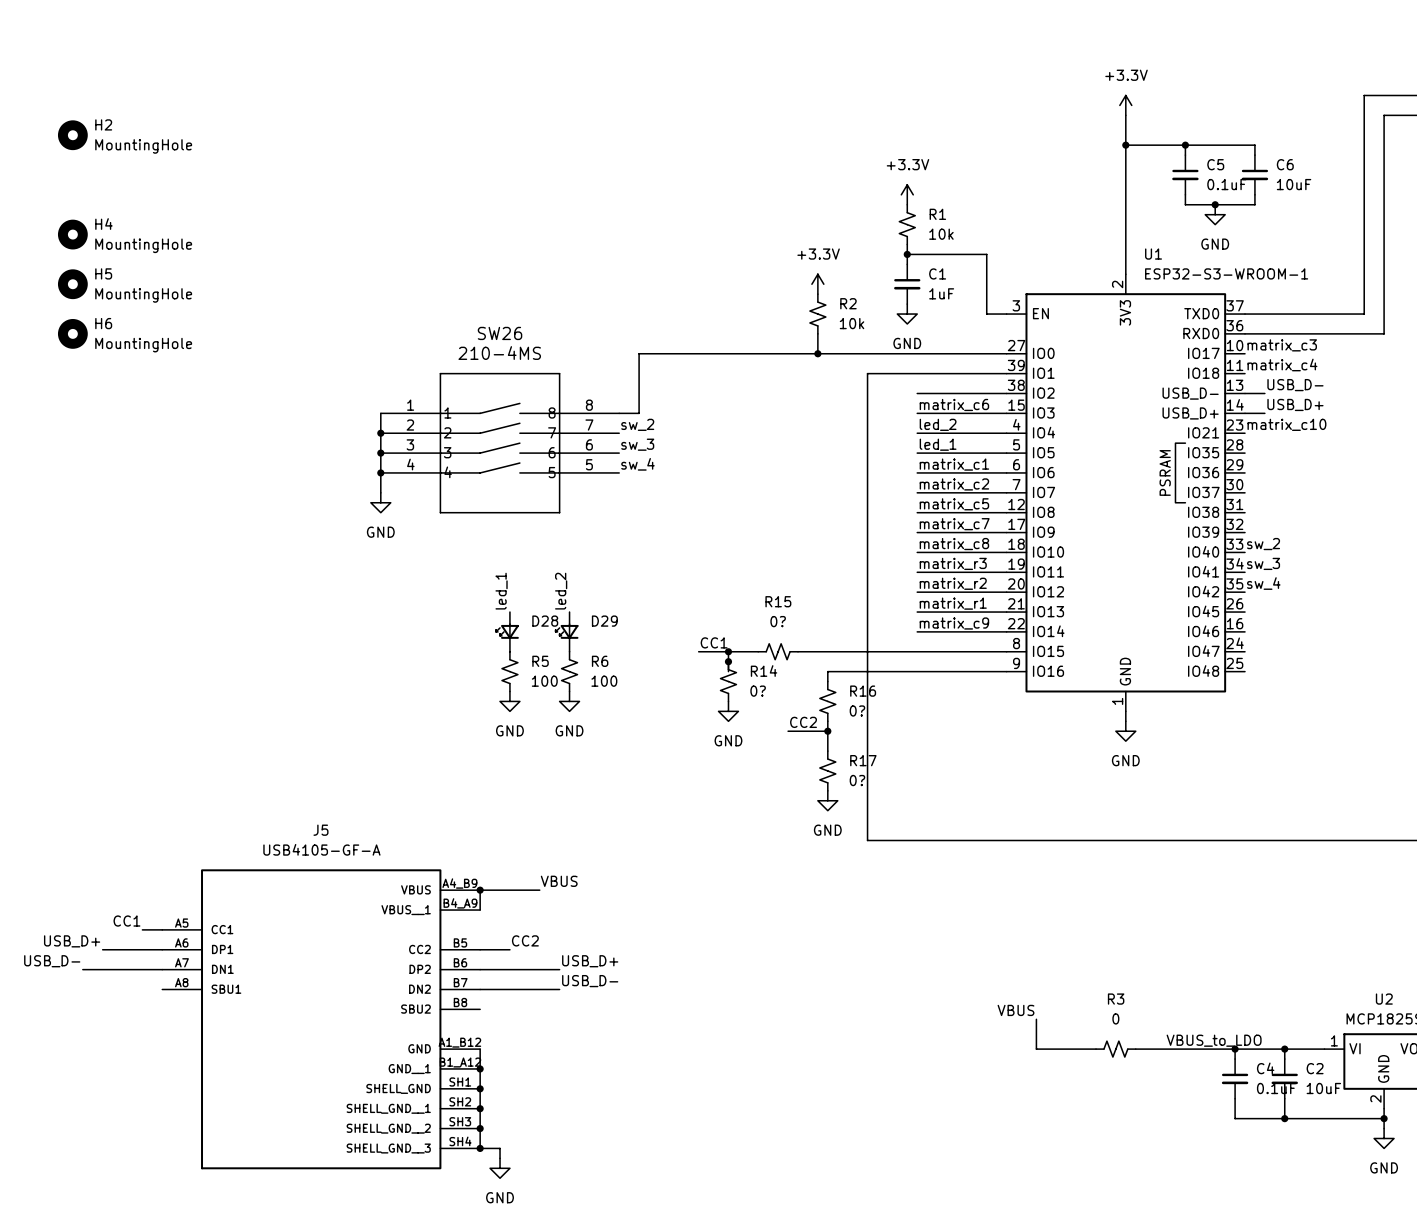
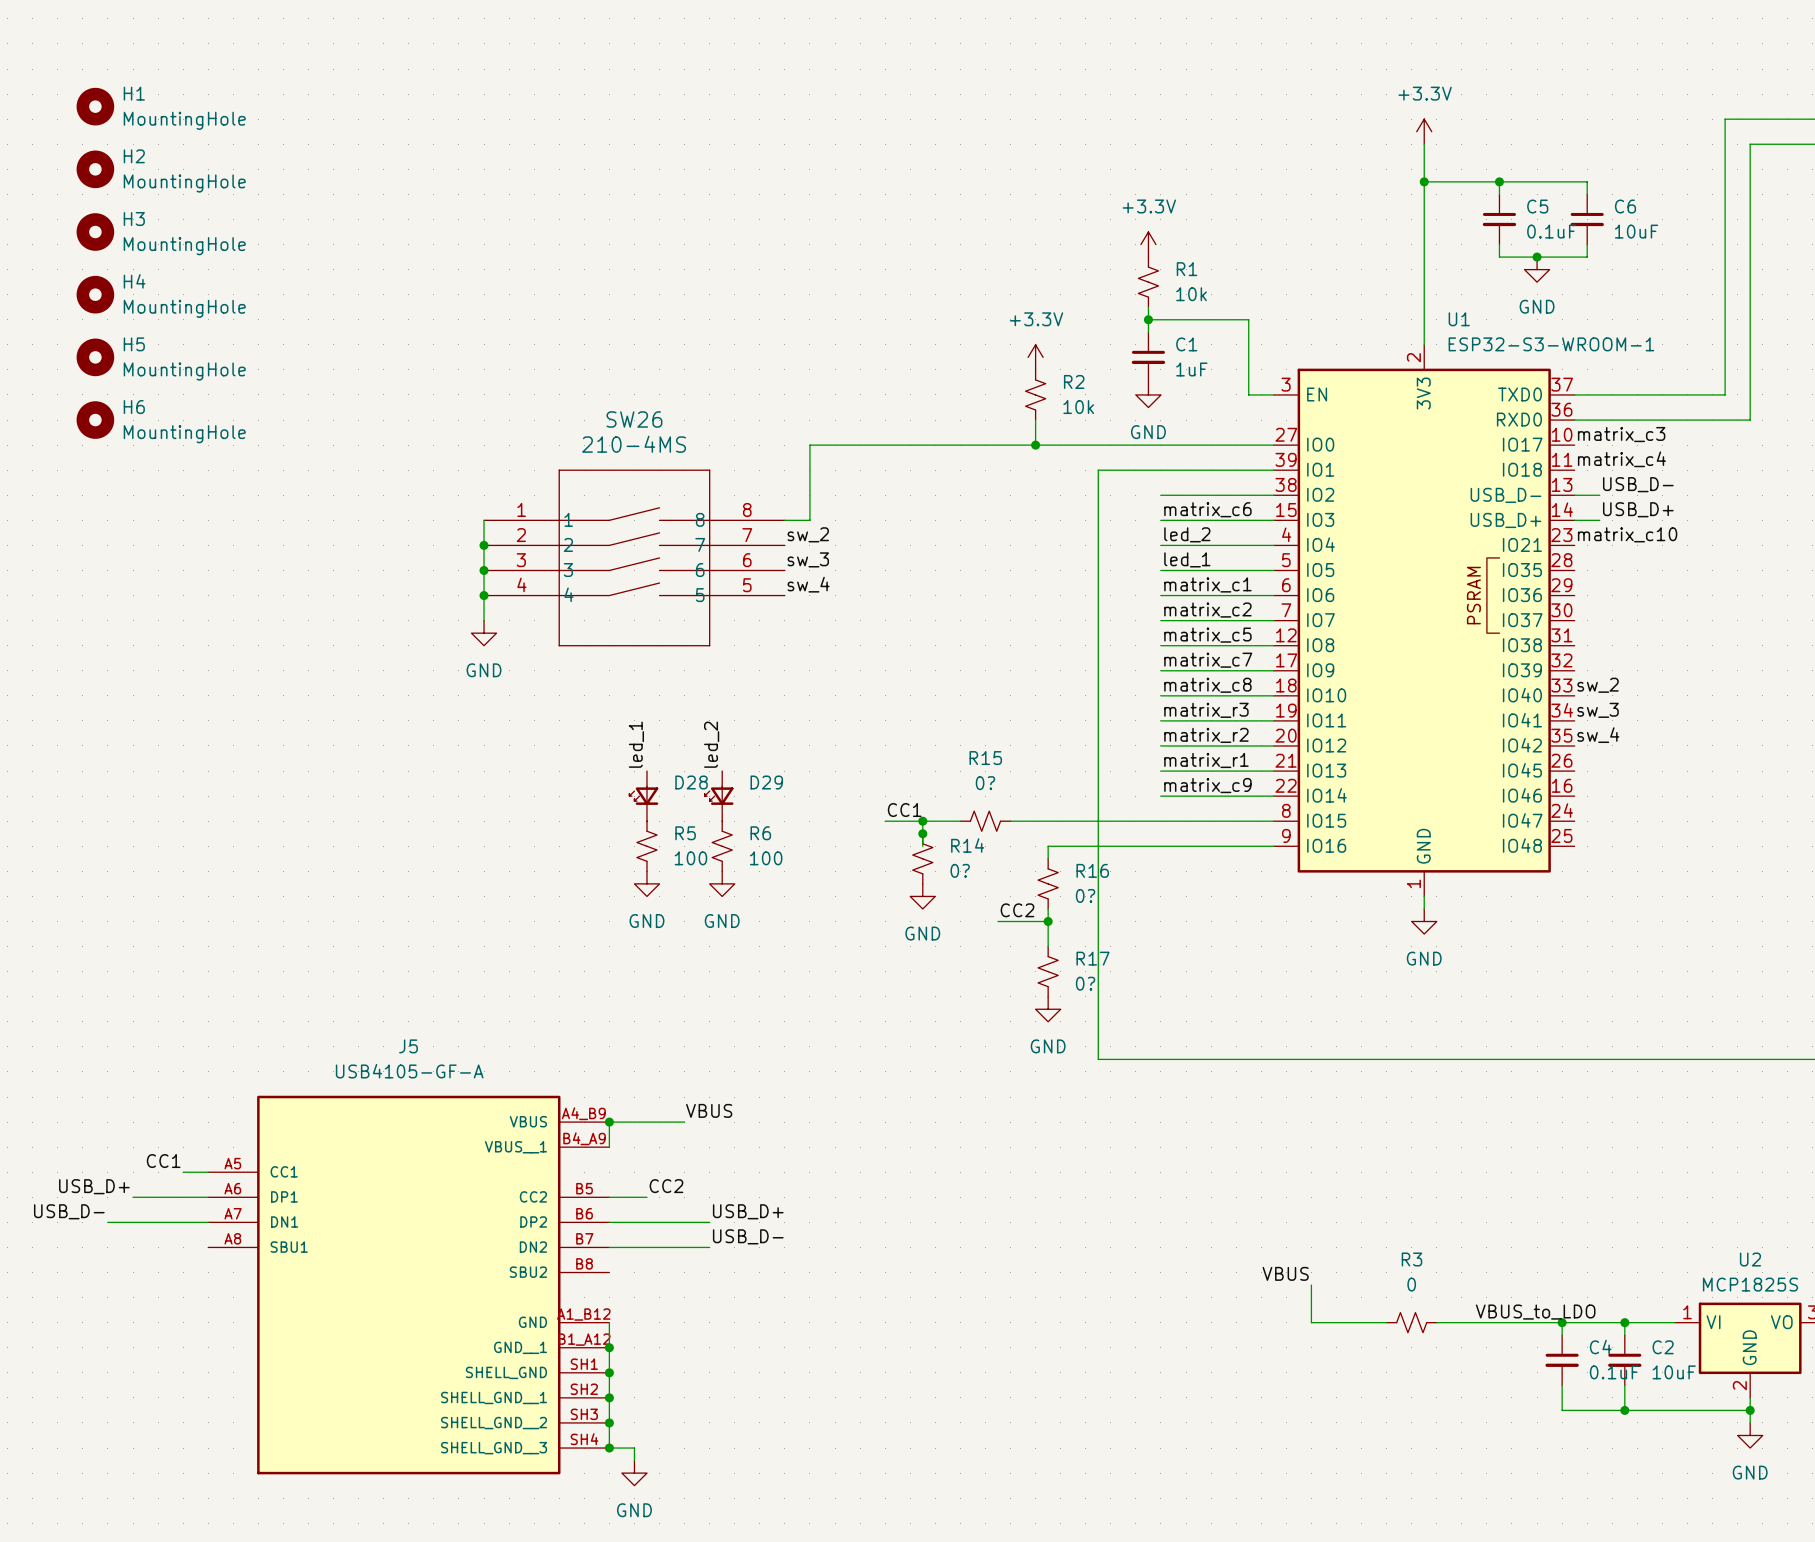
H1: none -> MountingHole (95, 106)
H3: none -> MountingHole (95, 232)

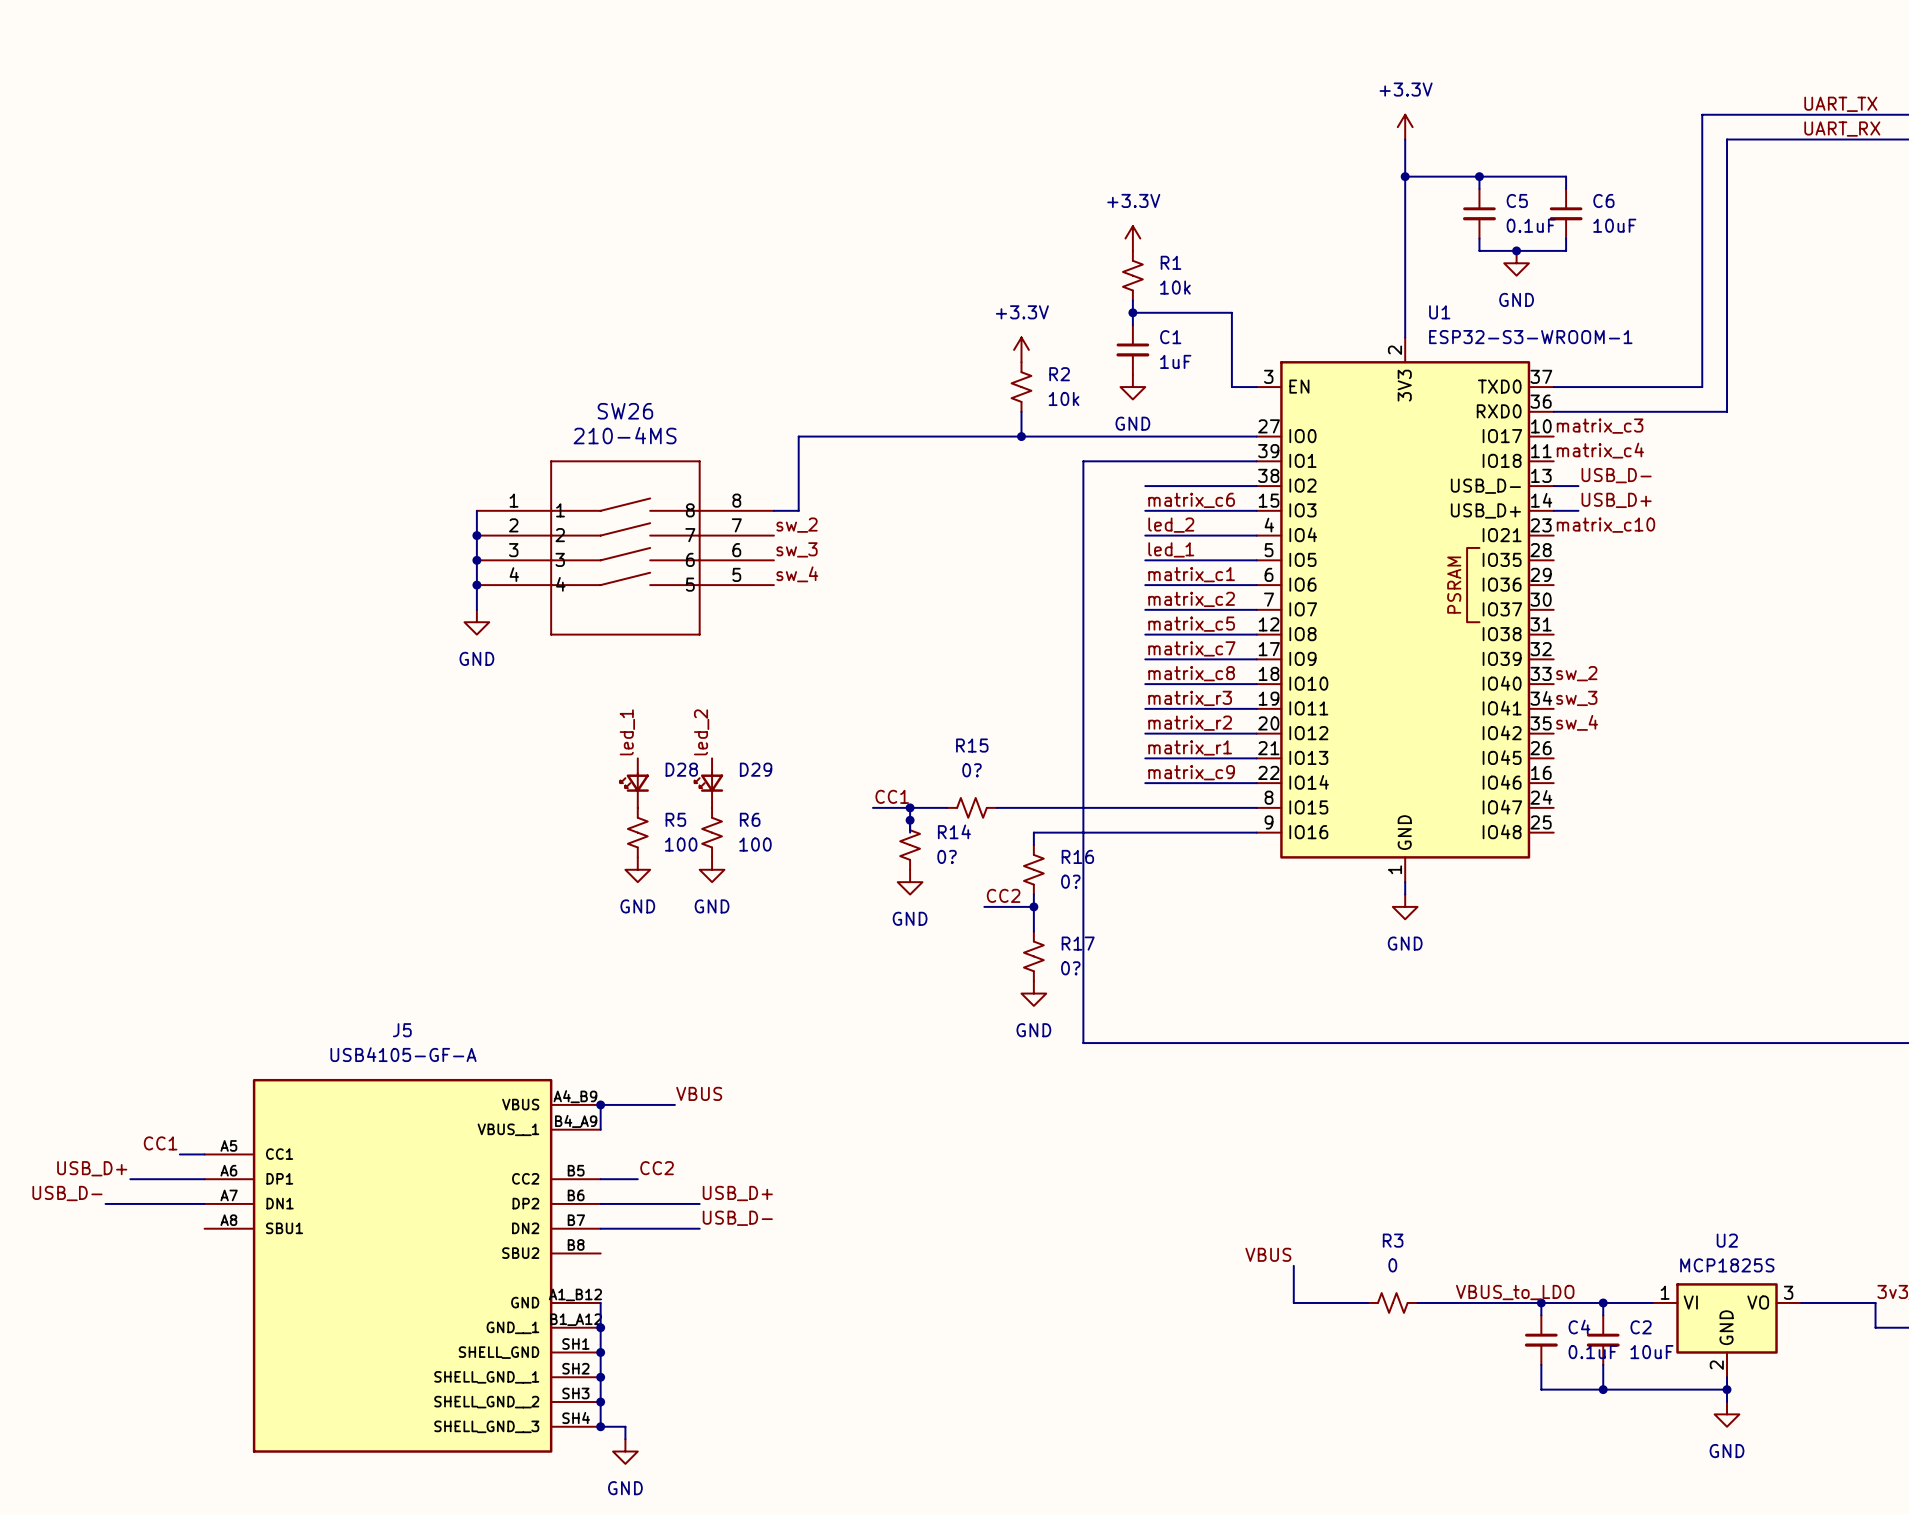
H1: MountingHole (95, 106) -> none
H2: MountingHole (95, 169) -> none
H3: MountingHole (95, 232) -> none
H4: MountingHole (95, 294) -> none
H5: MountingHole (95, 357) -> none
H6: MountingHole (95, 420) -> none

